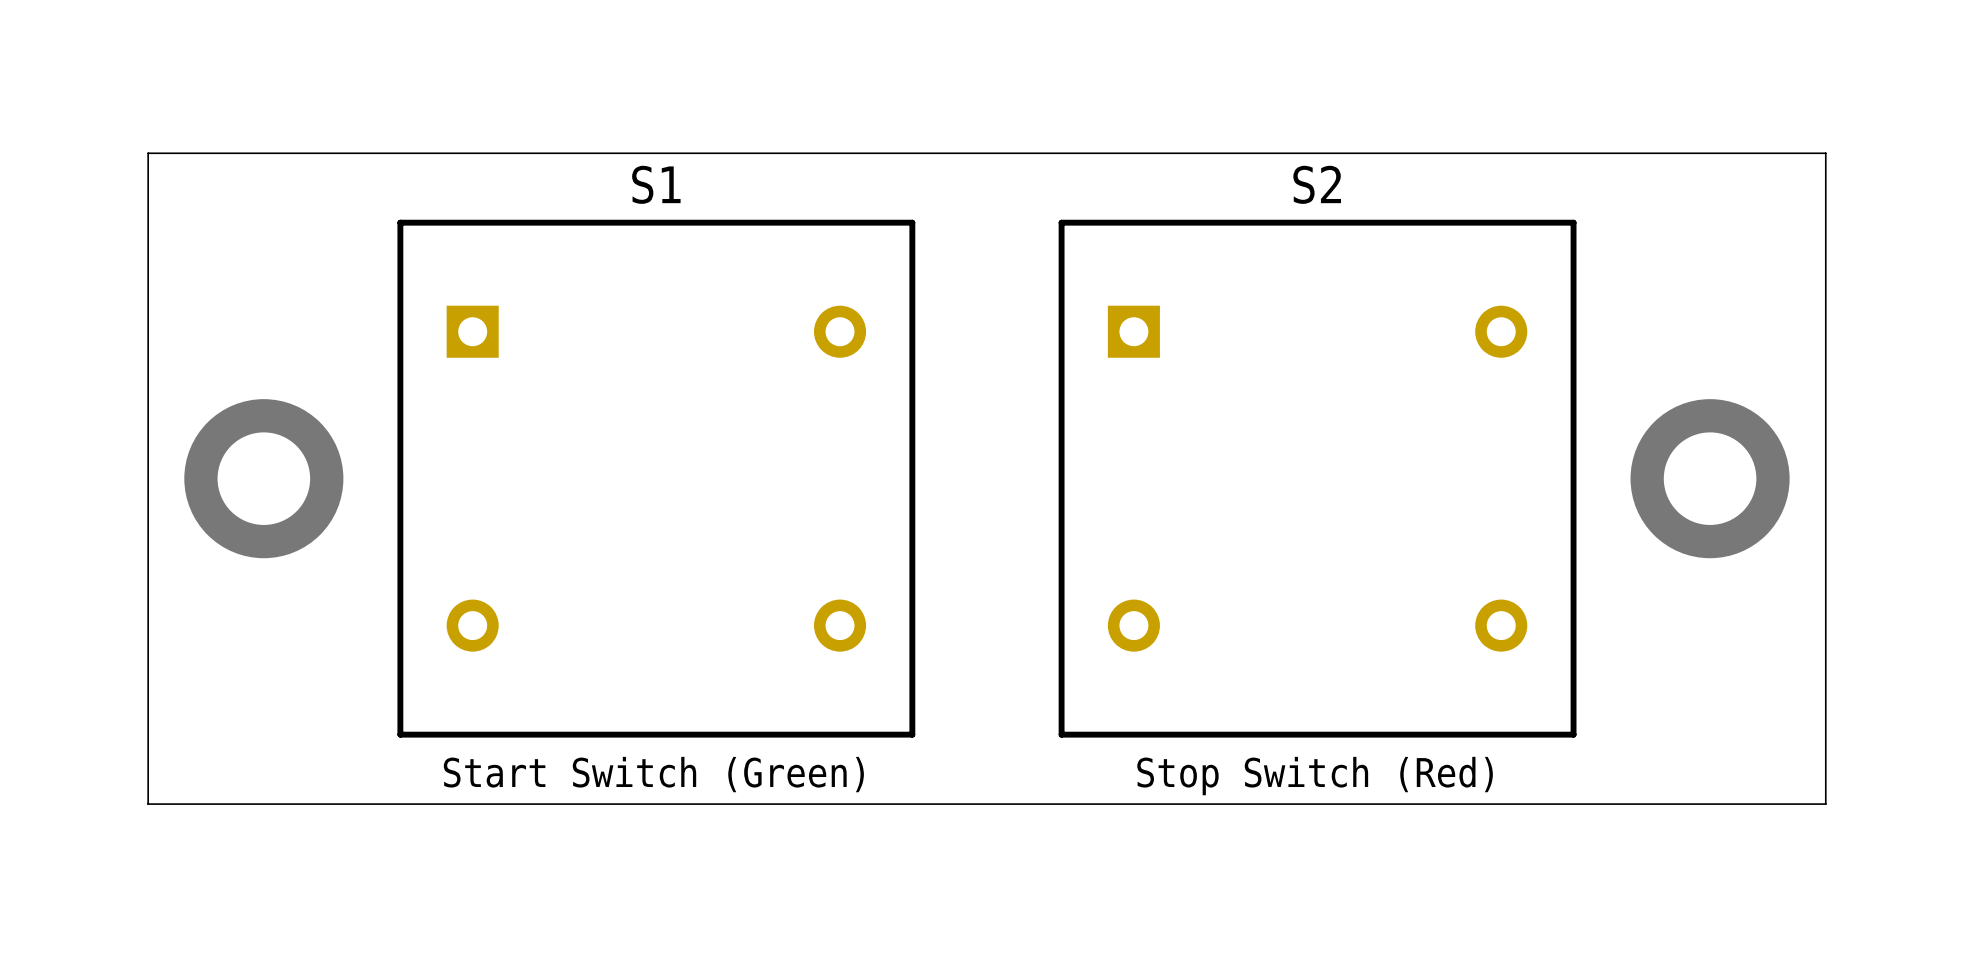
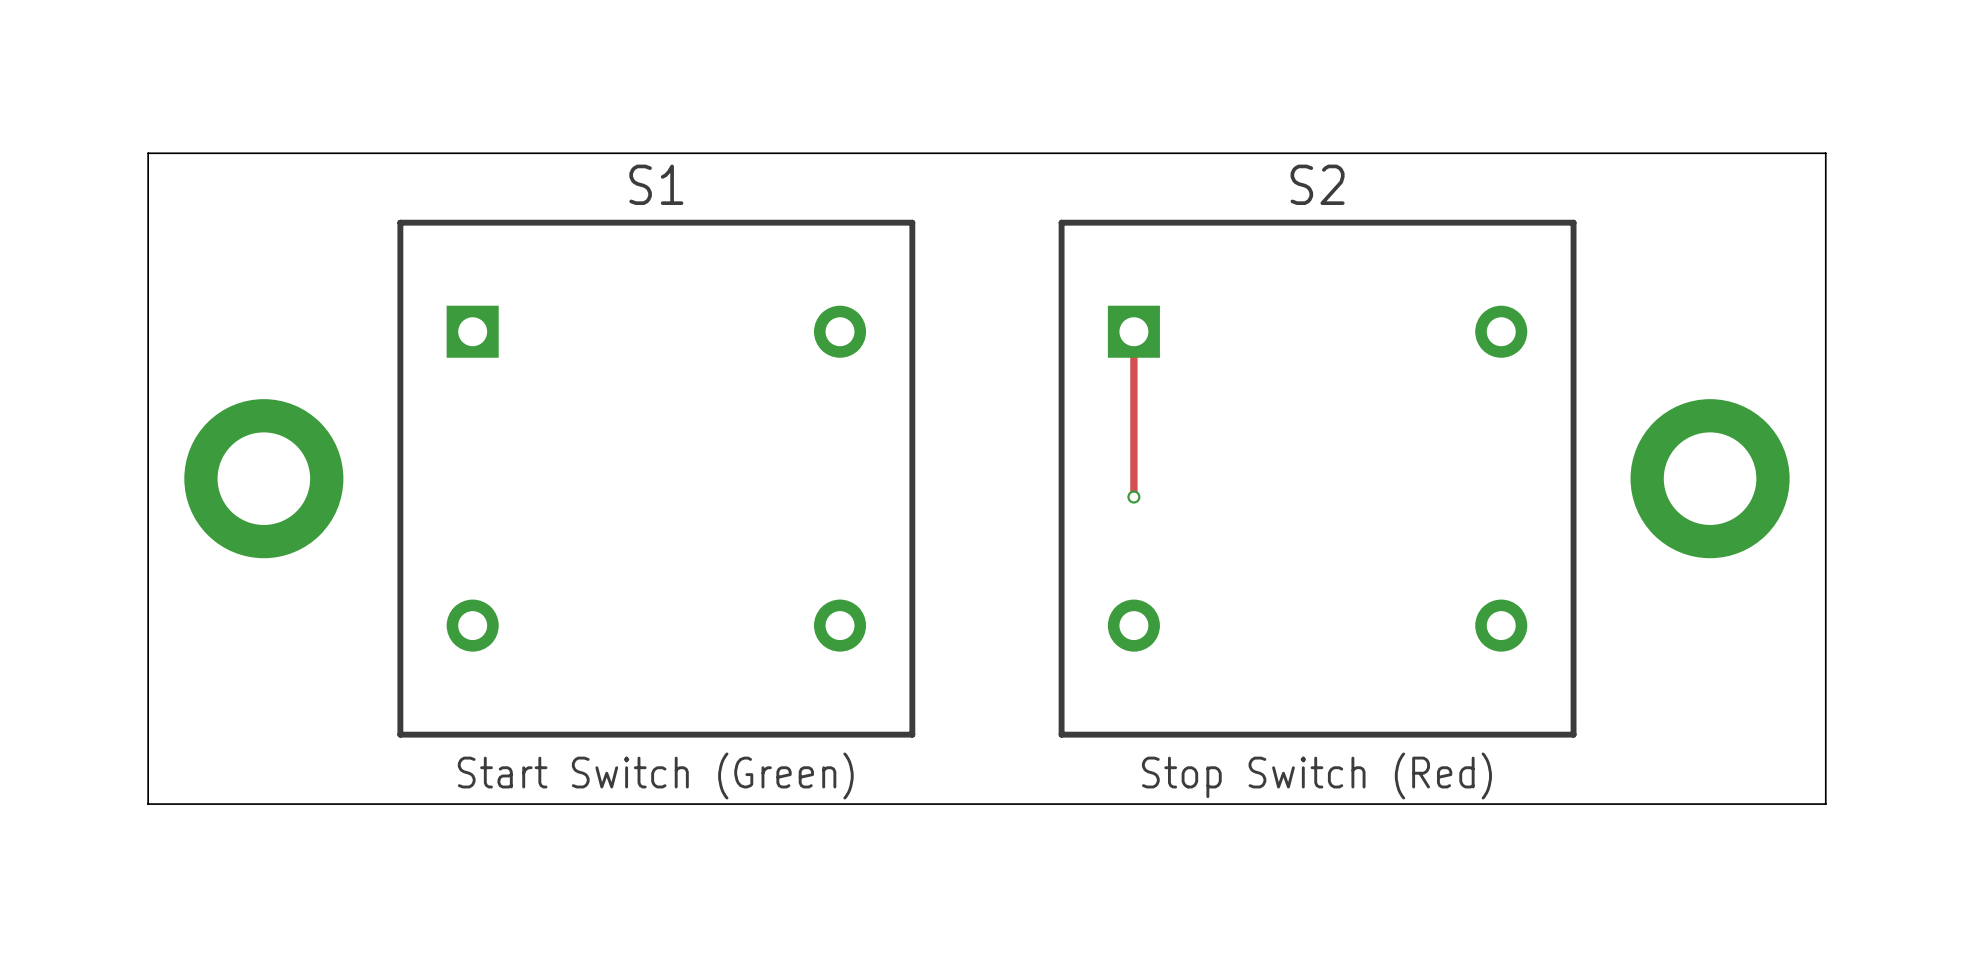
track: none -> (1133, 331) (1133, 497)
via: none -> (1133, 497)

